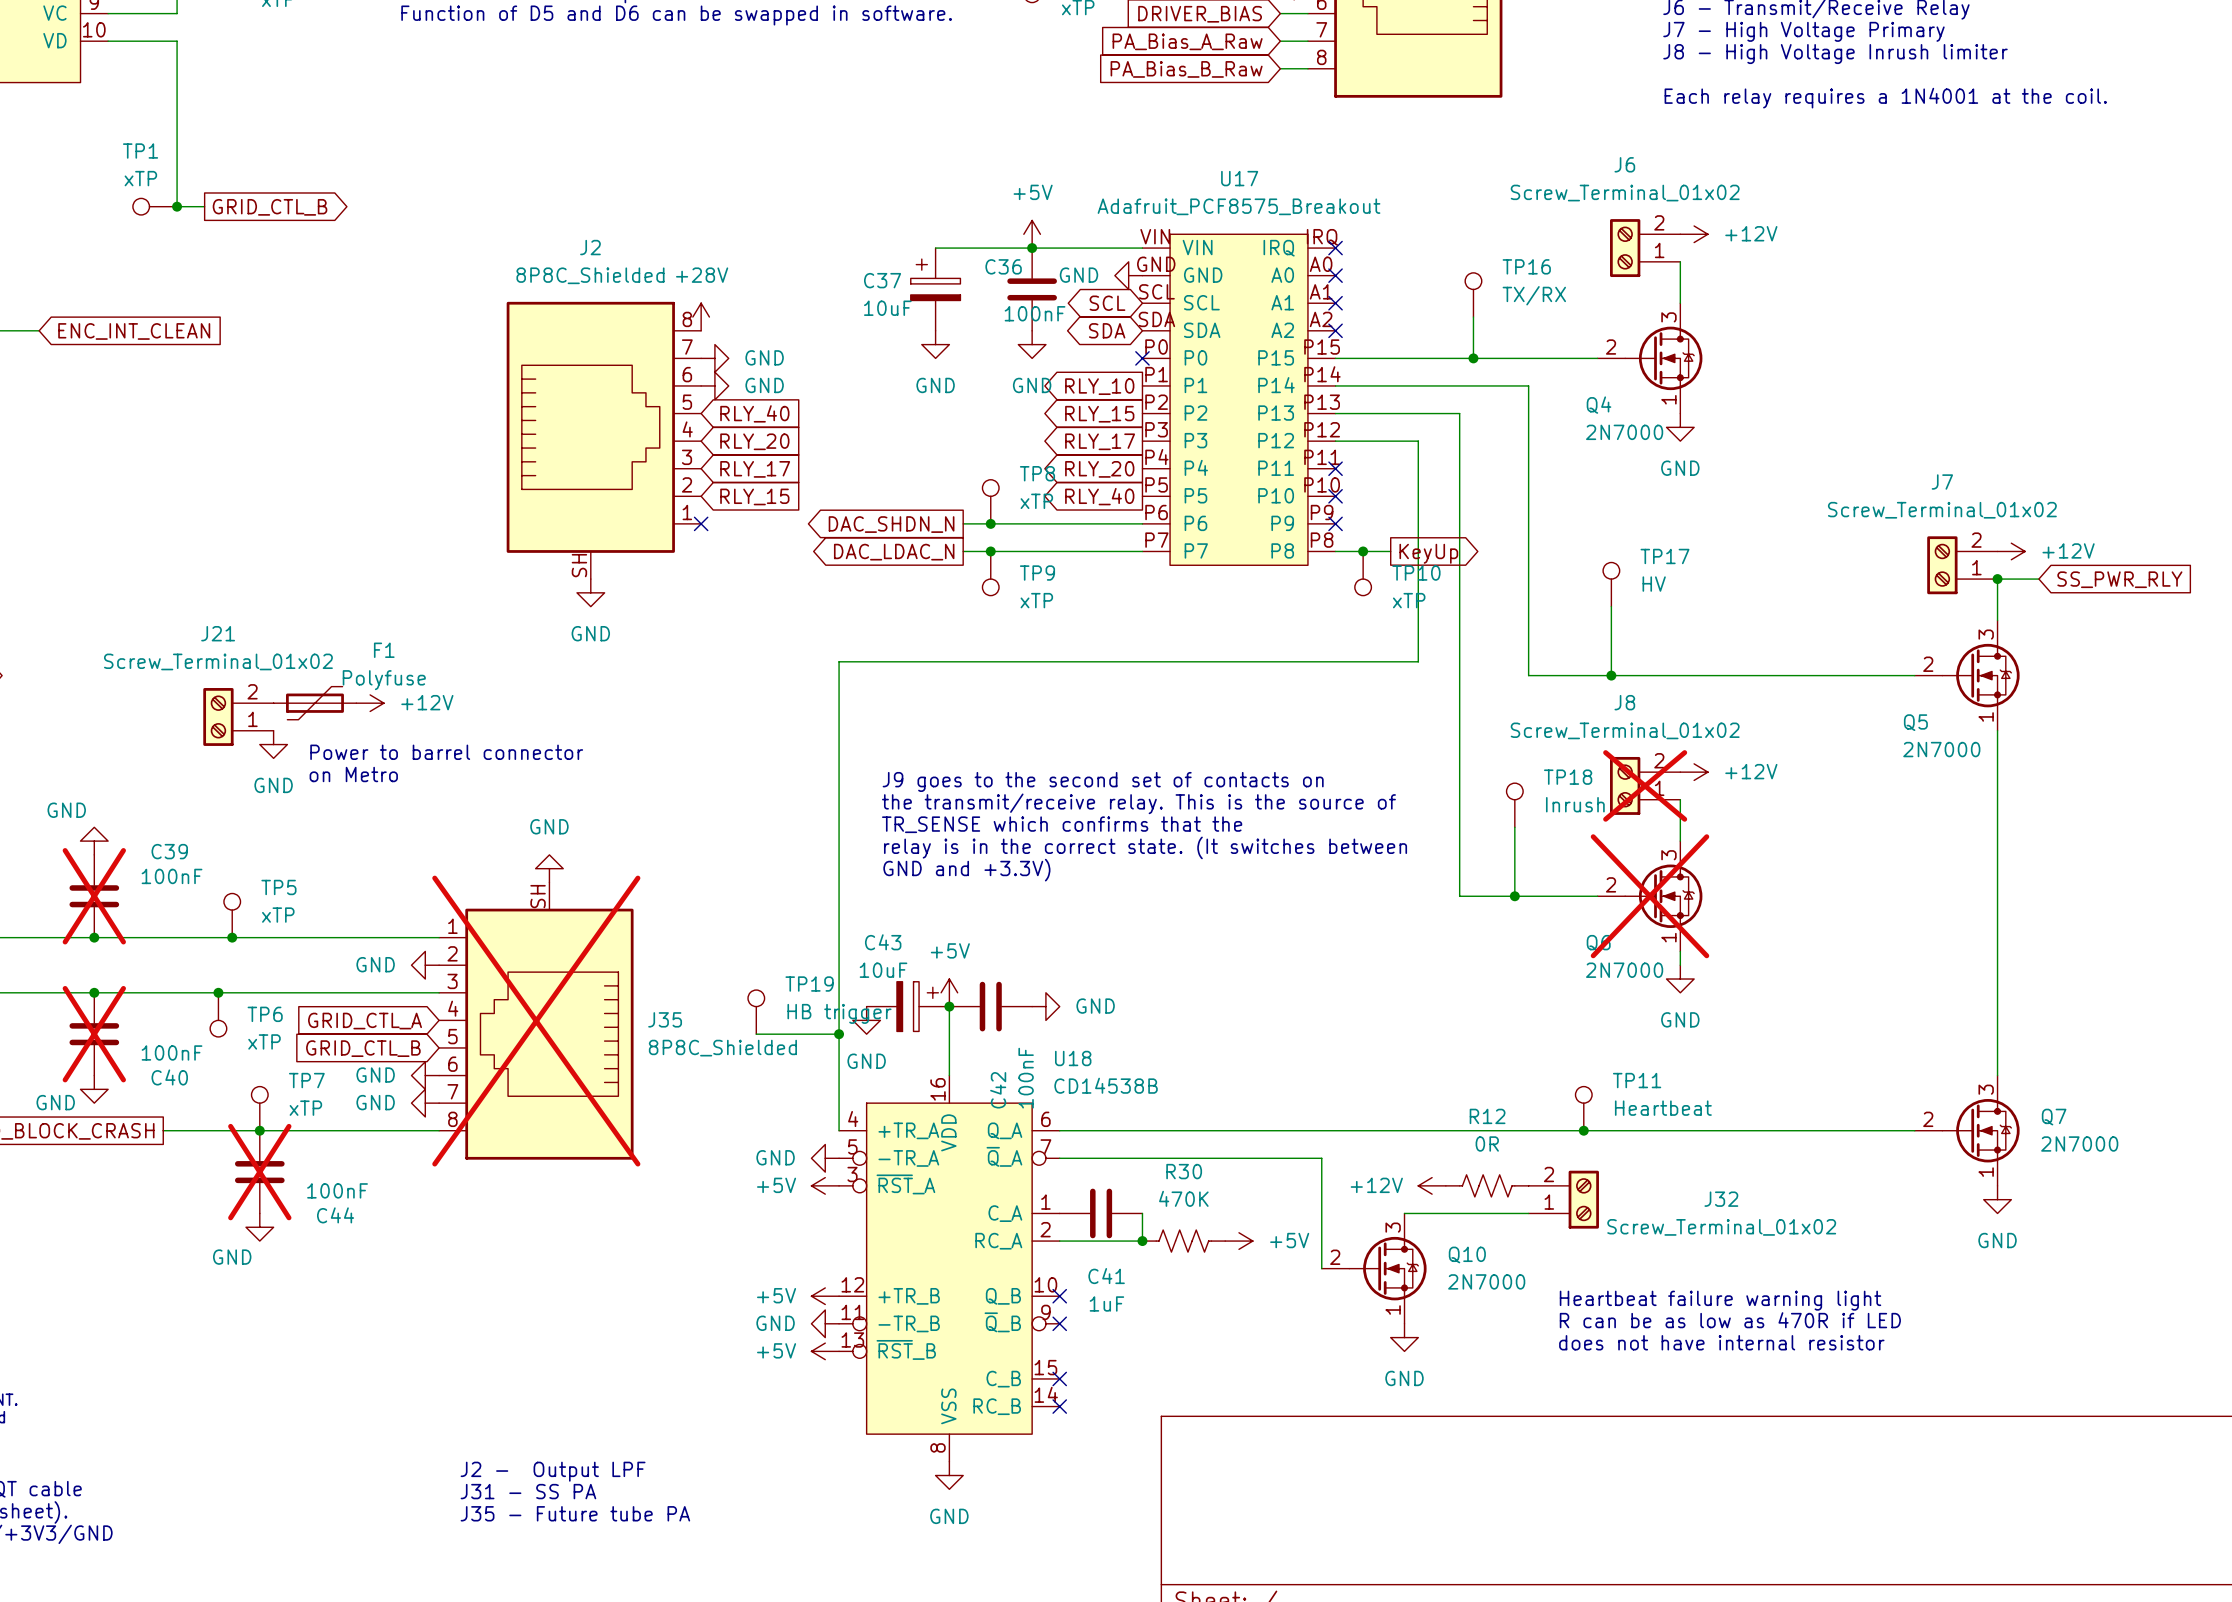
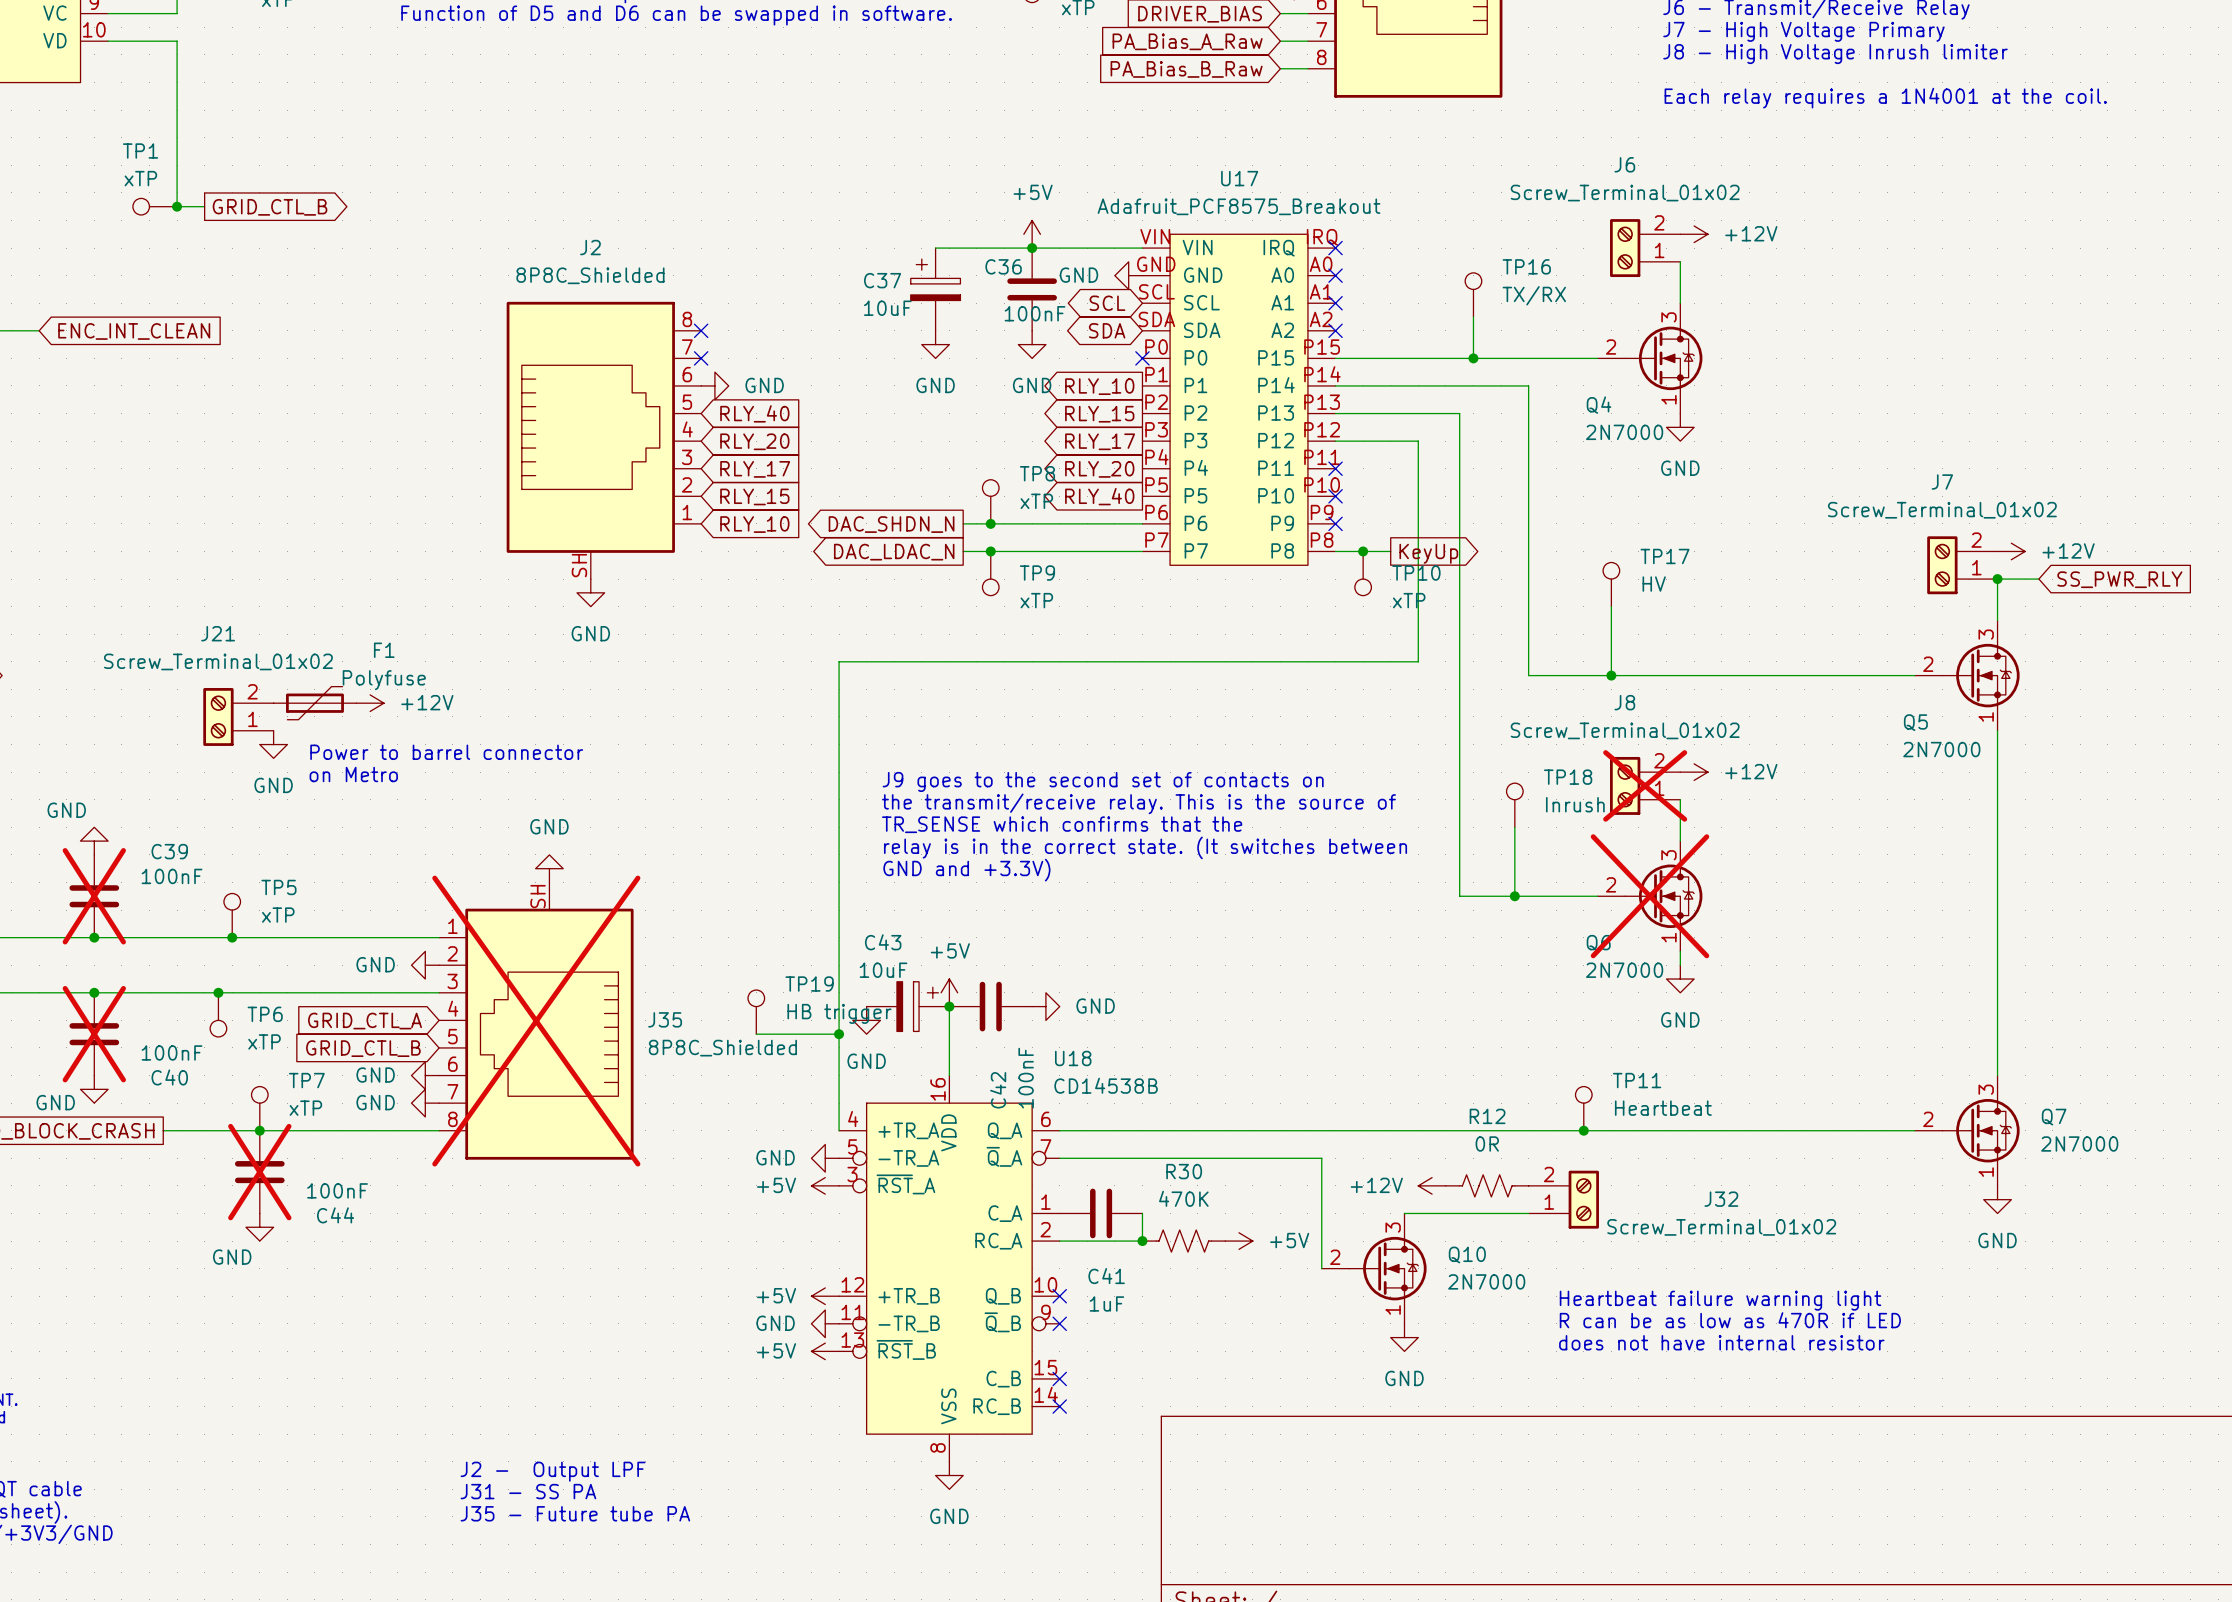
power symbol: +28V (701, 317) -> none
no-connect mark: none -> (701, 330)
no-connect mark: none -> (701, 358)
power symbol: GND (714, 358) -> none
no-connect mark: (701, 523) -> none
global label: none -> RLY_10 (754, 524)

